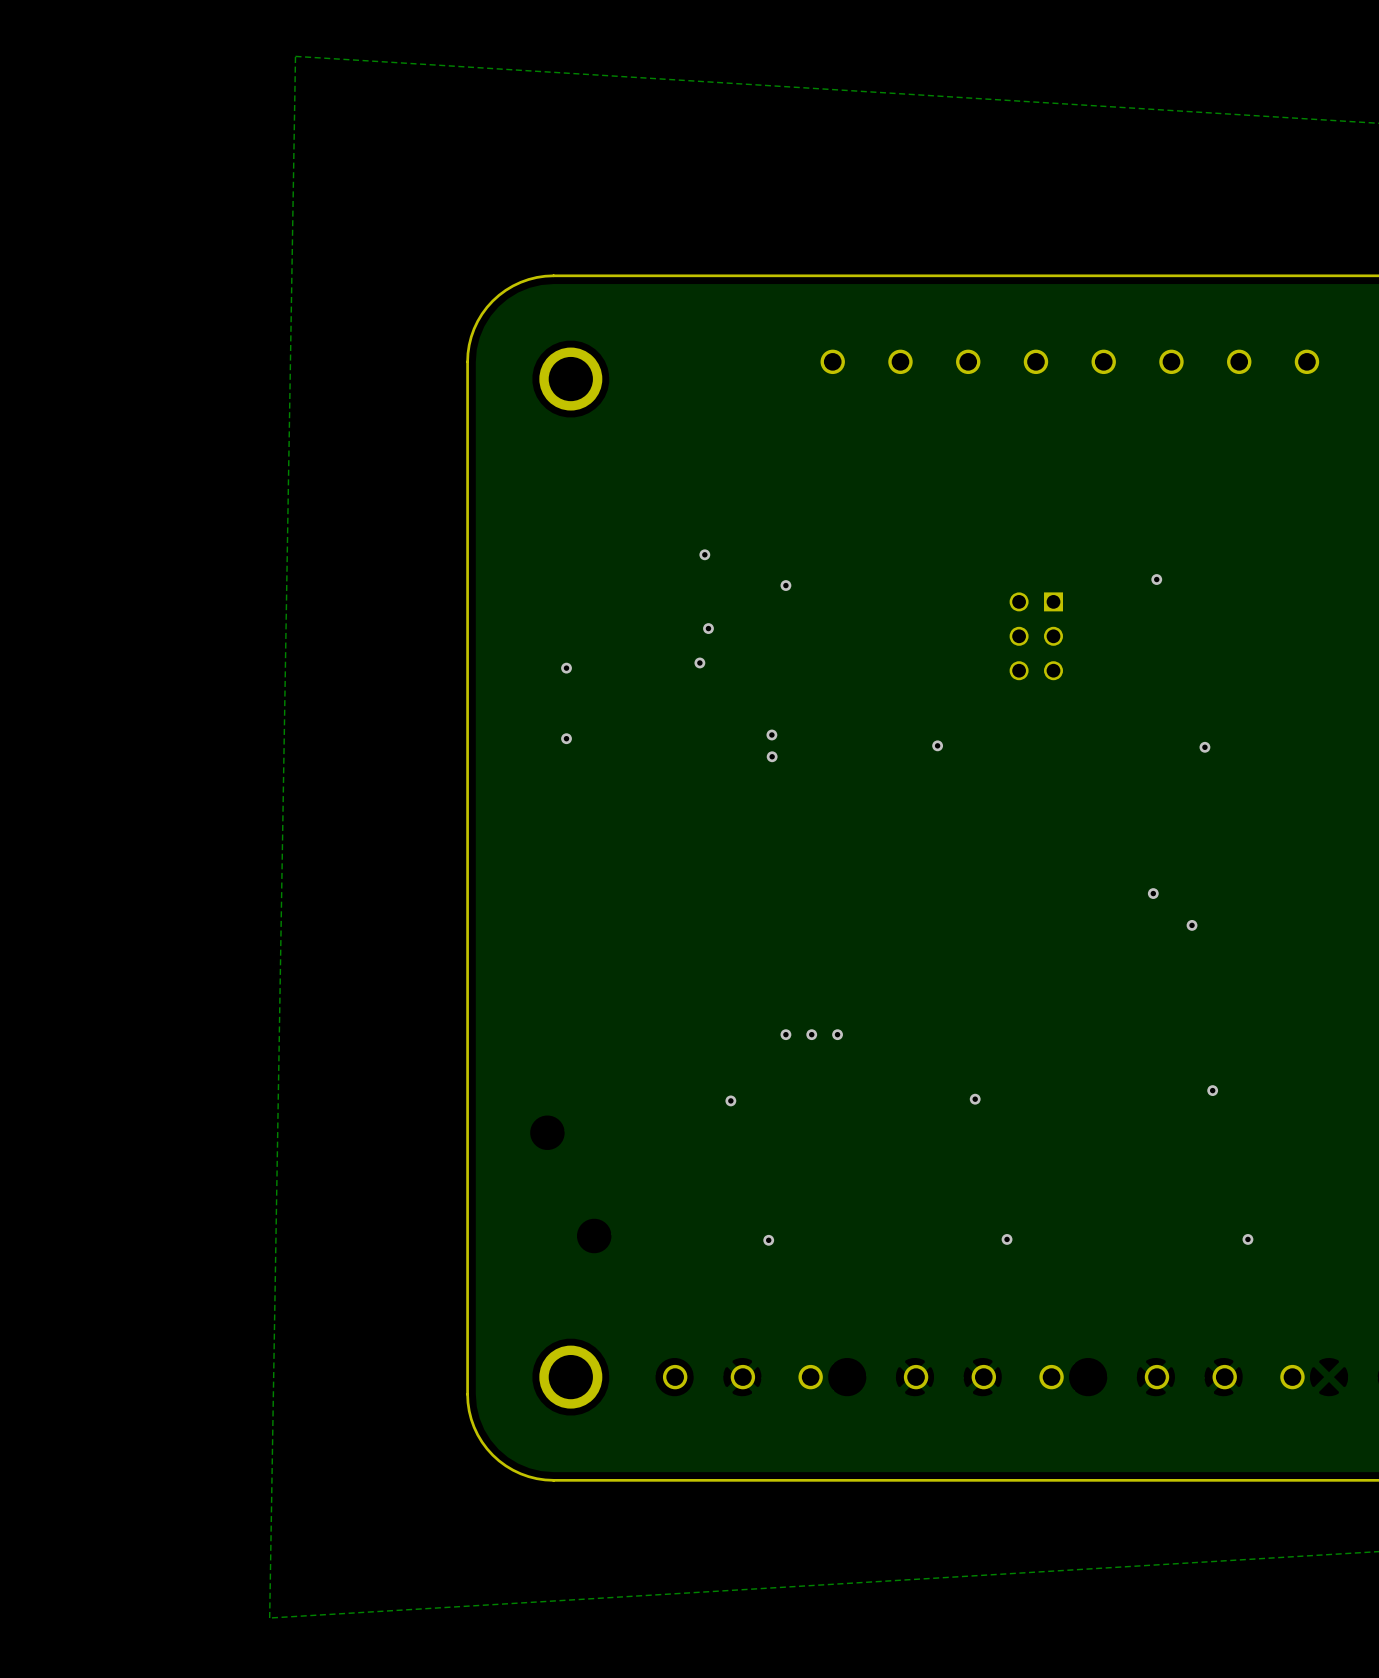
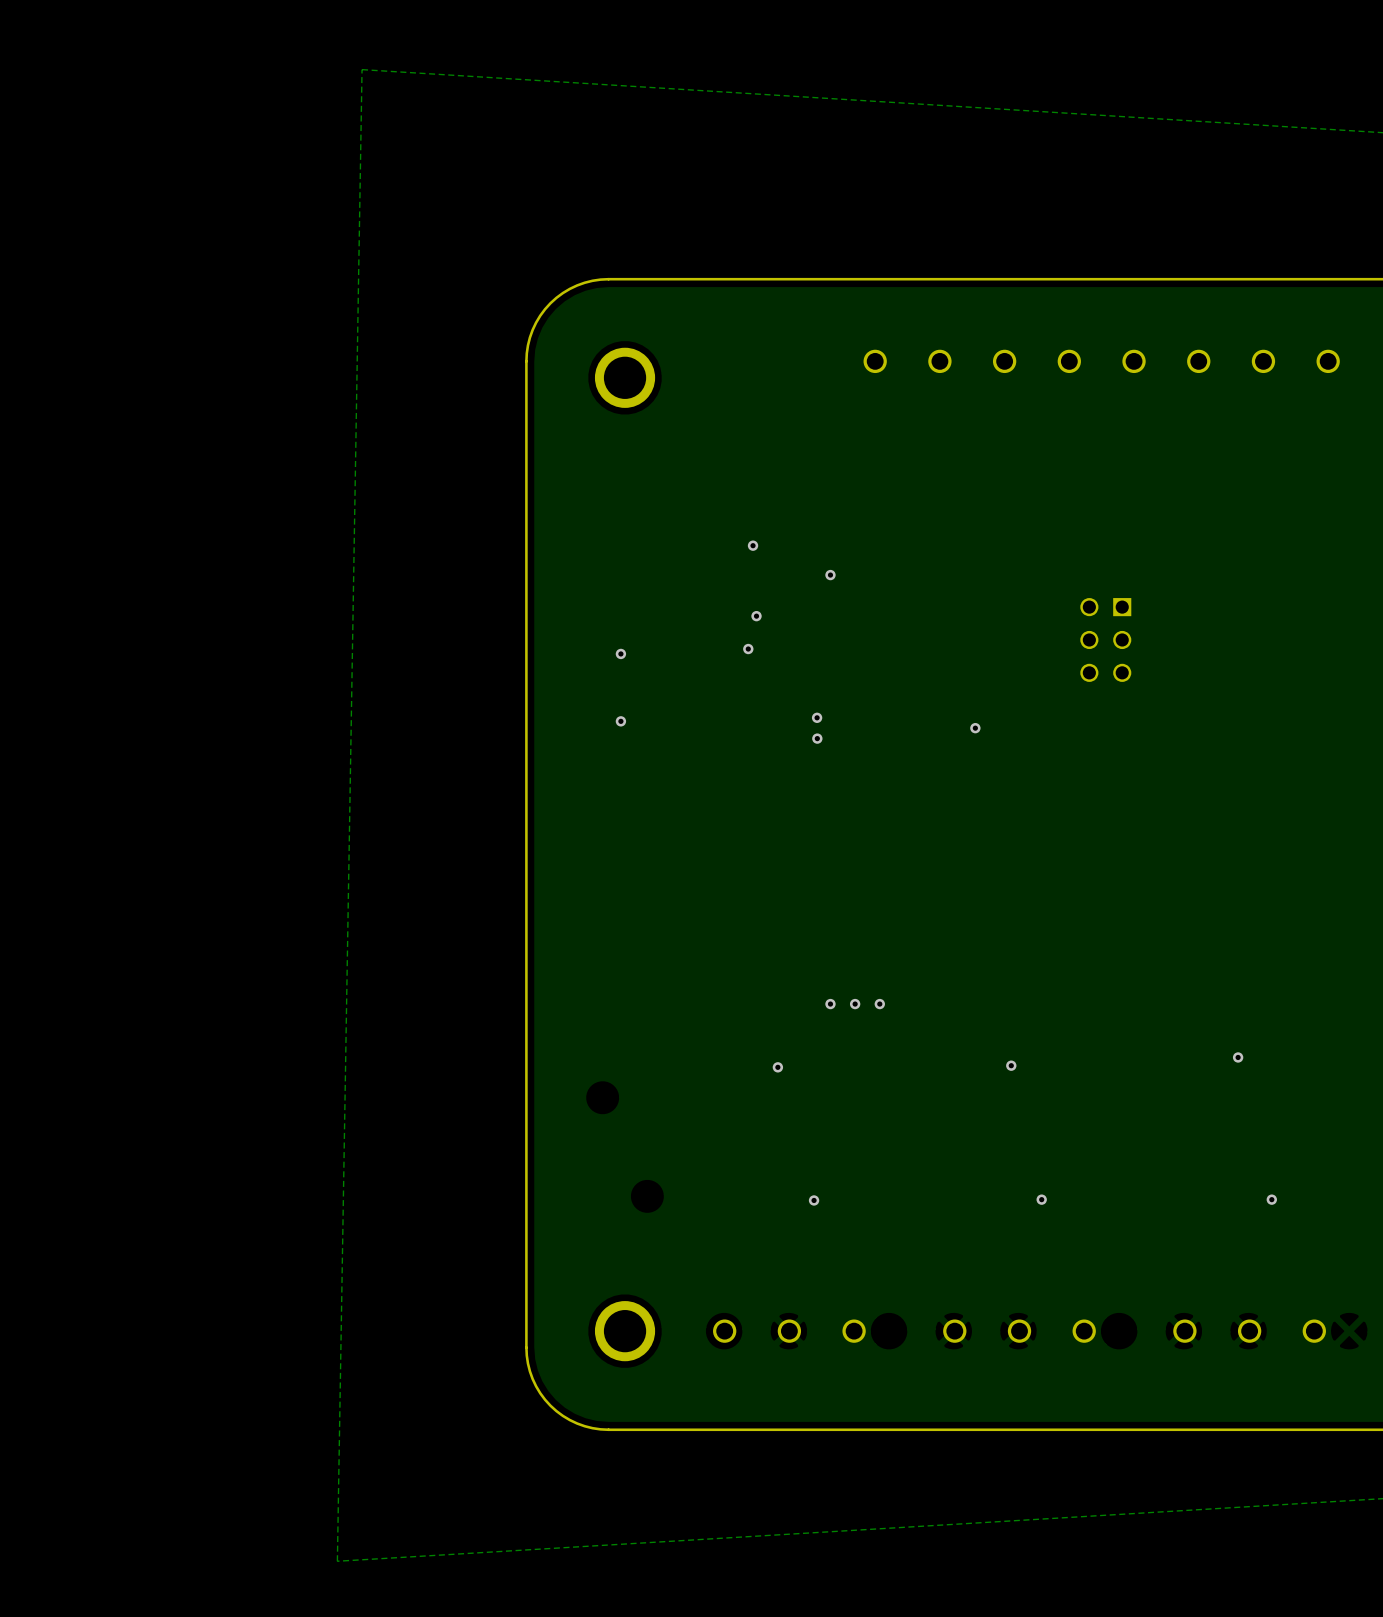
via: (1156, 579) -> none
part position: (1036, 636) -> (1105, 639)
via: (1204, 747) -> none
via: (1153, 893) -> none
via: (1192, 925) -> none

